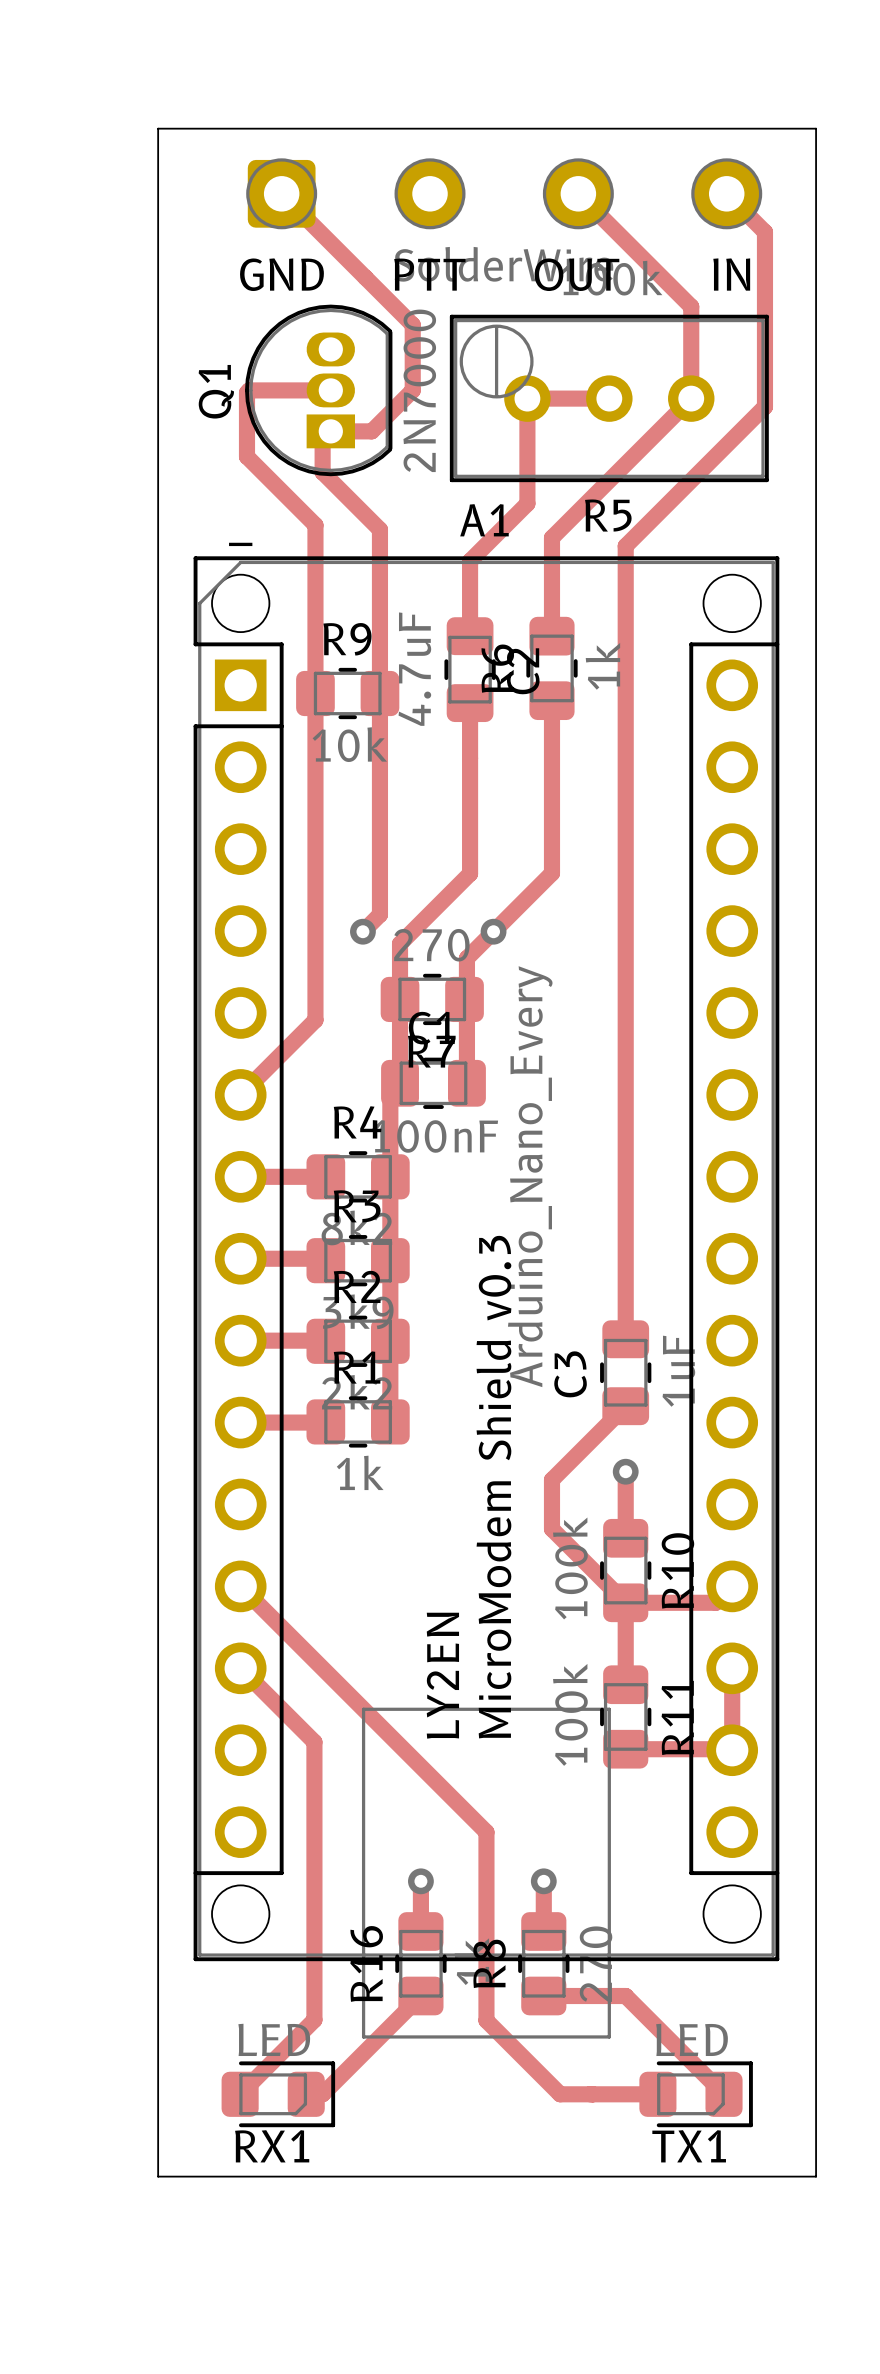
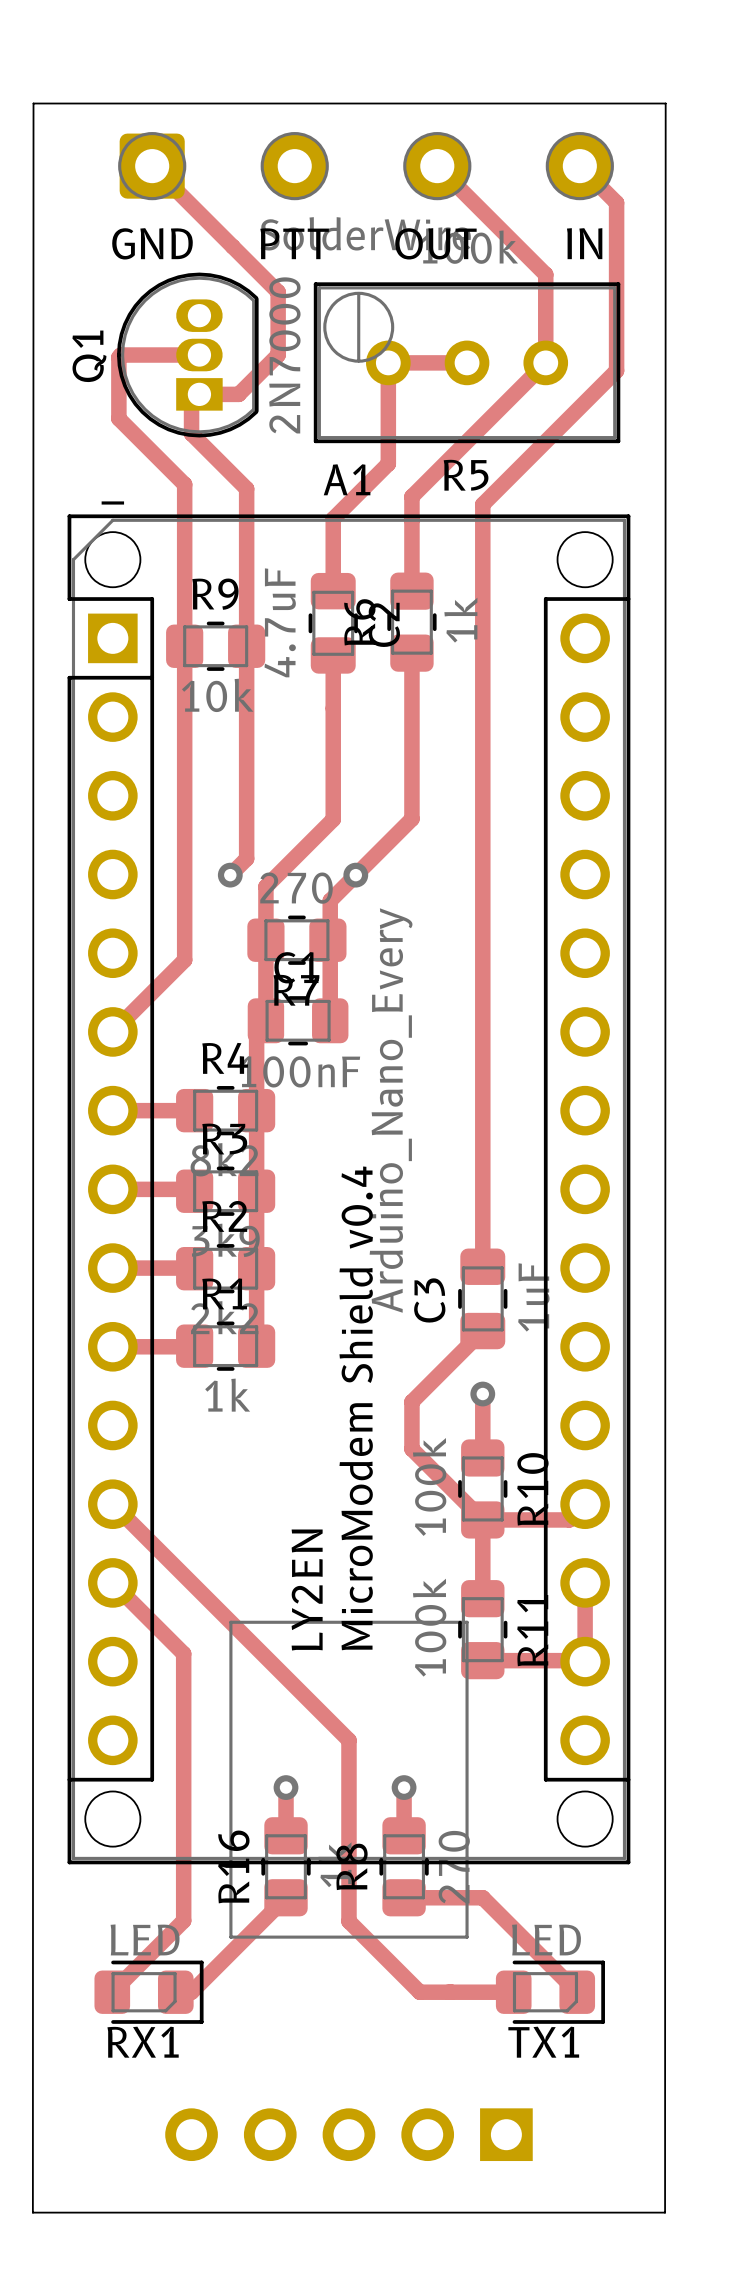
board edge: (158, 128) (158, 2176) (816, 2176) (816, 128) -> (33, 103) (32, 2212) (665, 2212) (665, 103)
text: MicroModem Shield v0.3 (493, 1487) -> MicroModem Shield v0.4 (356, 1408)
part: none -> (348, 2134)

